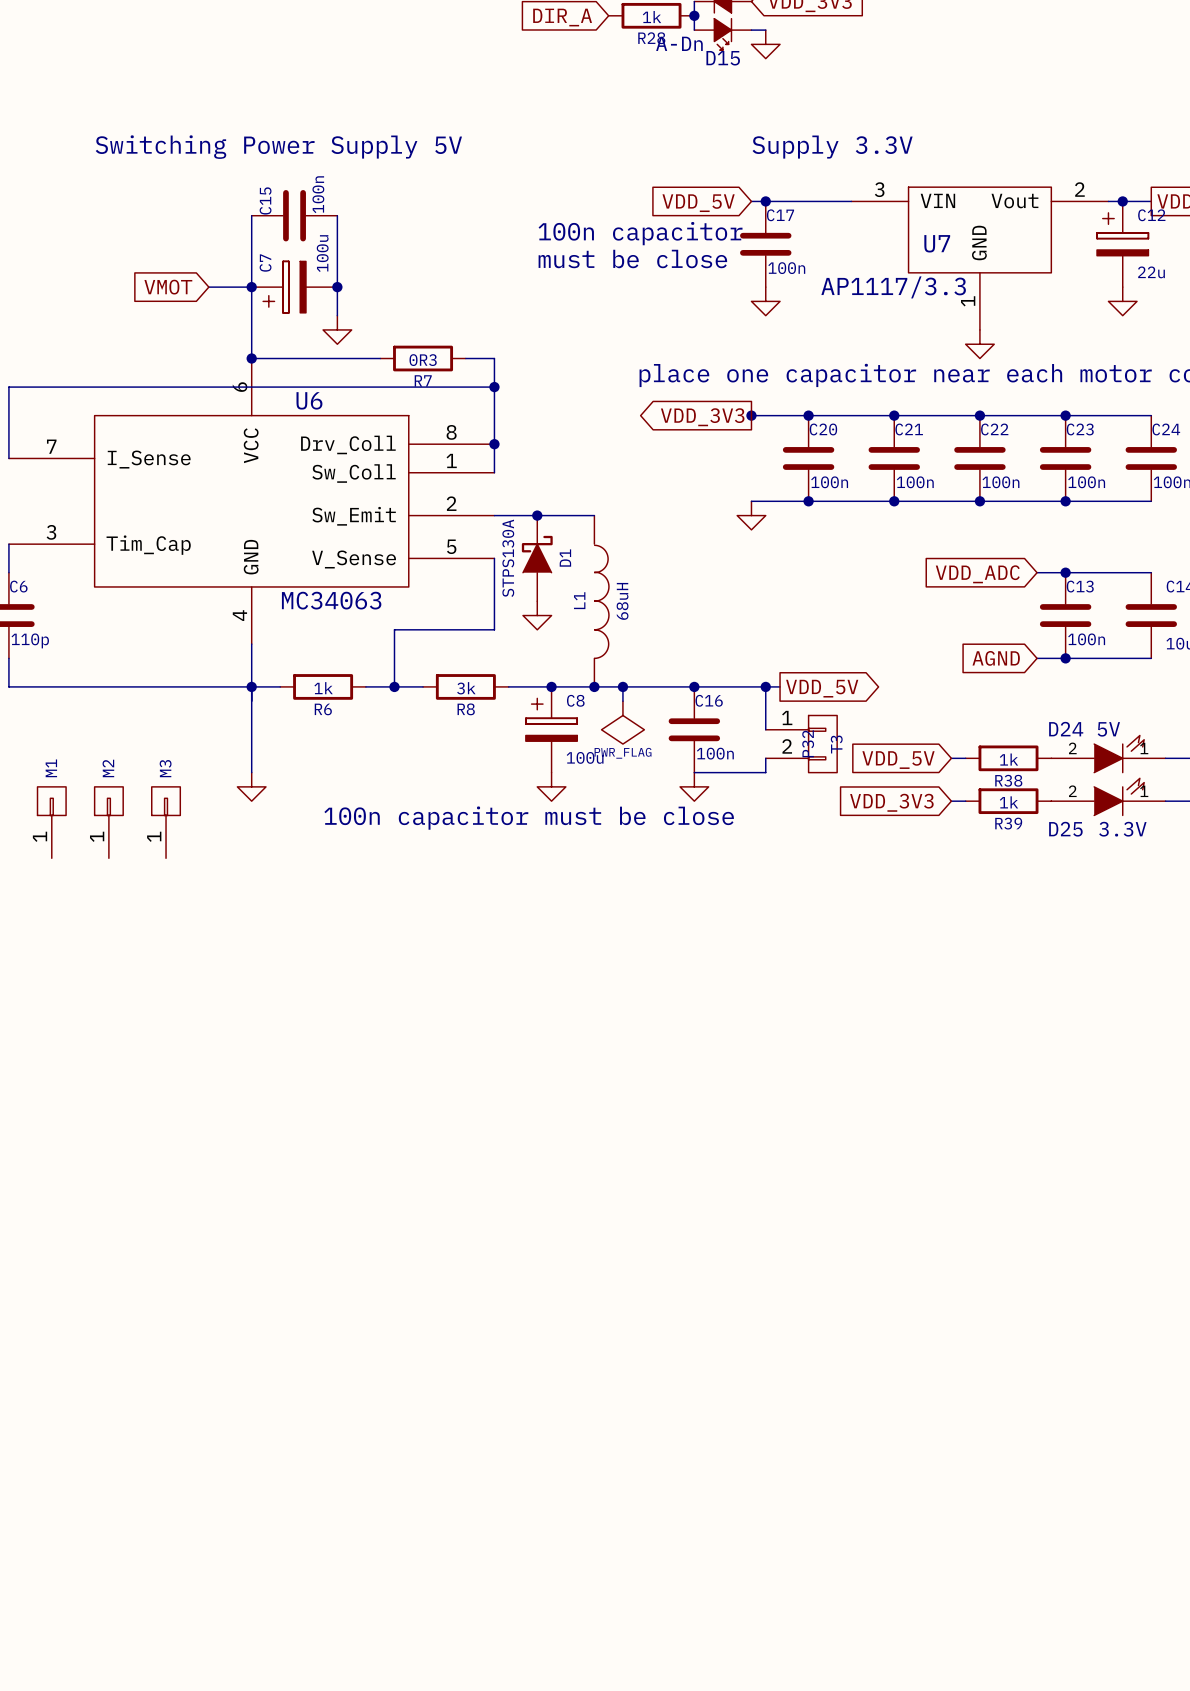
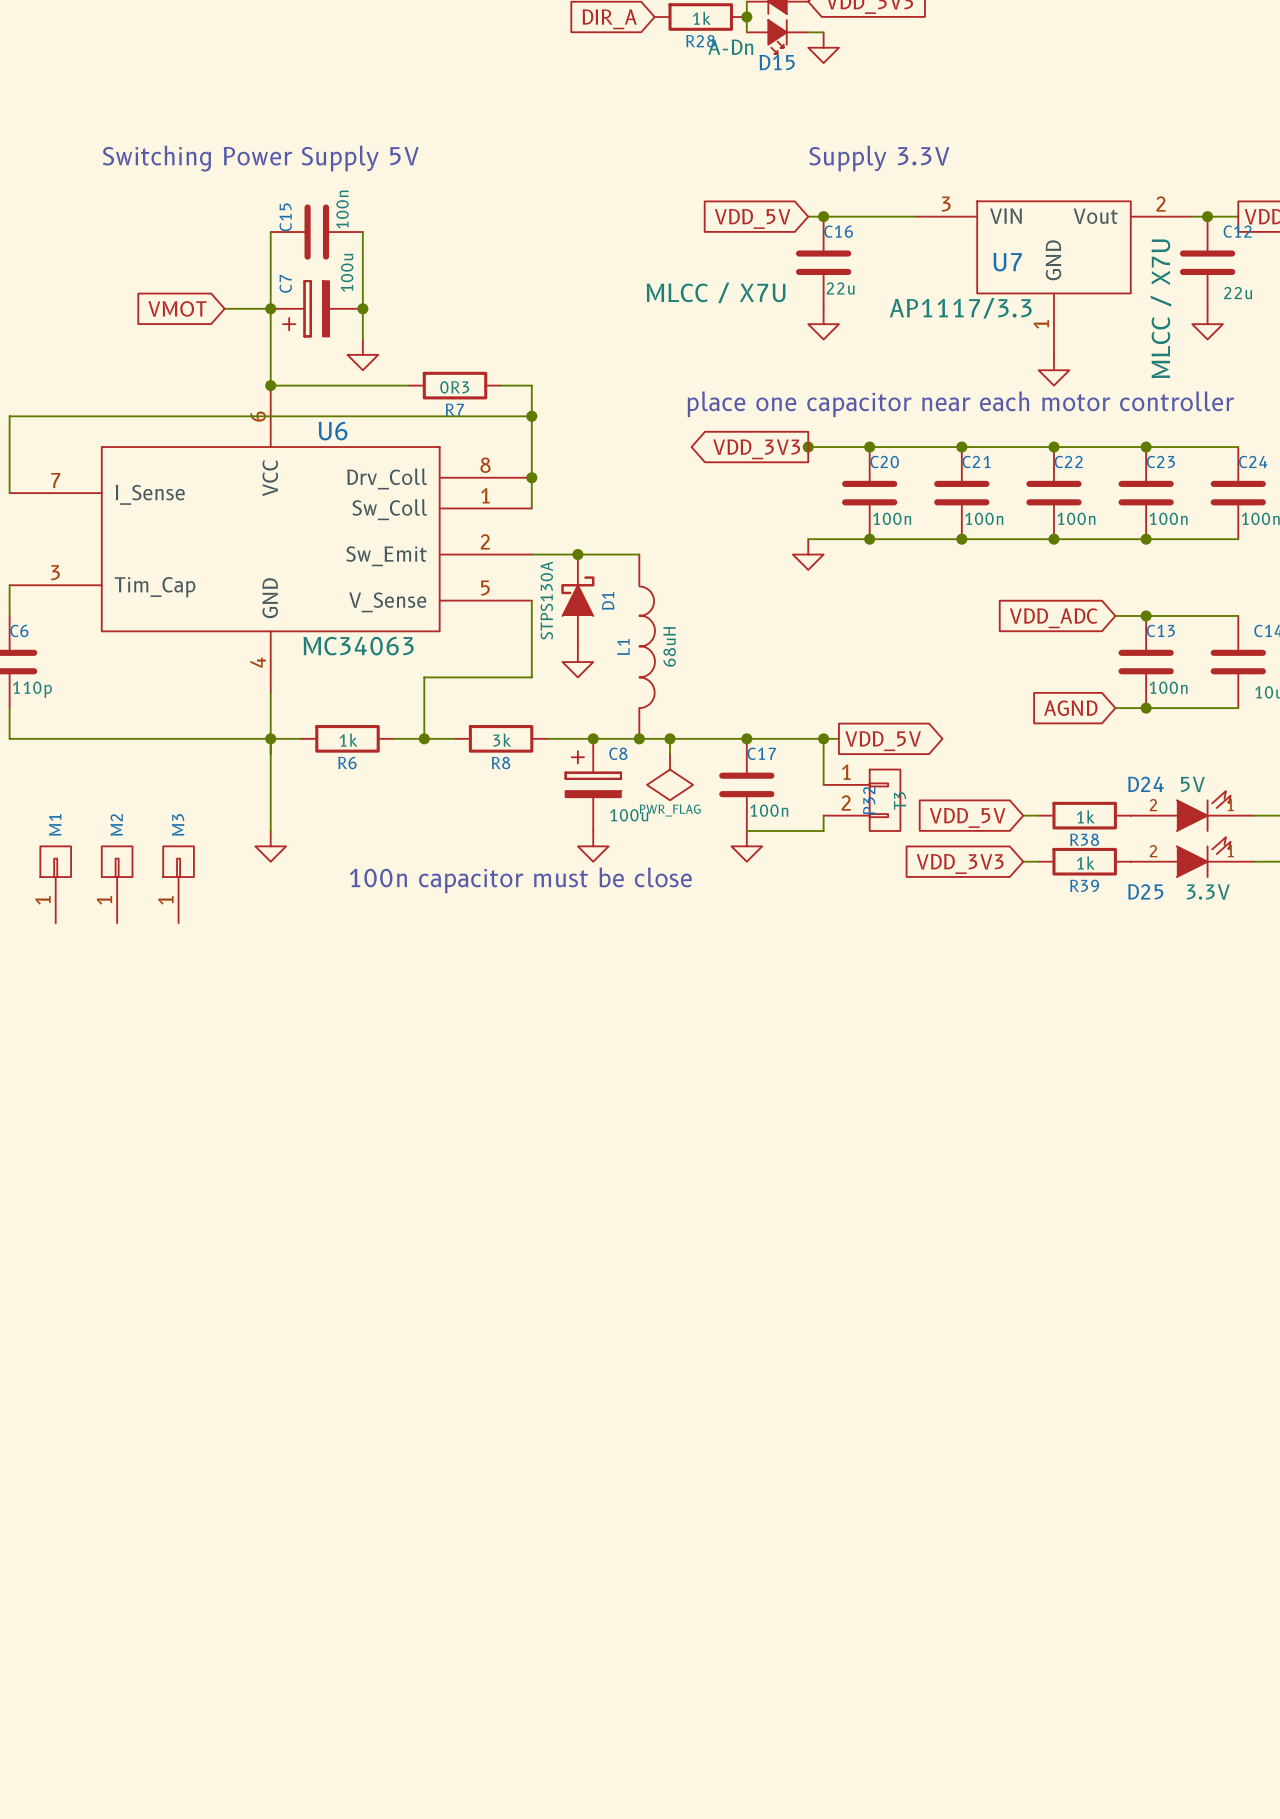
C12 symbol: [1097, 201, 1149, 288] -> [1179, 216, 1236, 309]
C17 name: C17 (780, 215) -> C16 (838, 231)
text: 100n capacitor (640, 233) -> none
text: must be close (632, 258) -> none
C17 value: 100n (786, 268) -> 22u (840, 288)
C17 text: none -> MLCC / X7U (716, 292)
C12 text: none -> MLCC / X7U (1160, 308)
C16 name: C16 (709, 700) -> C17 (761, 753)

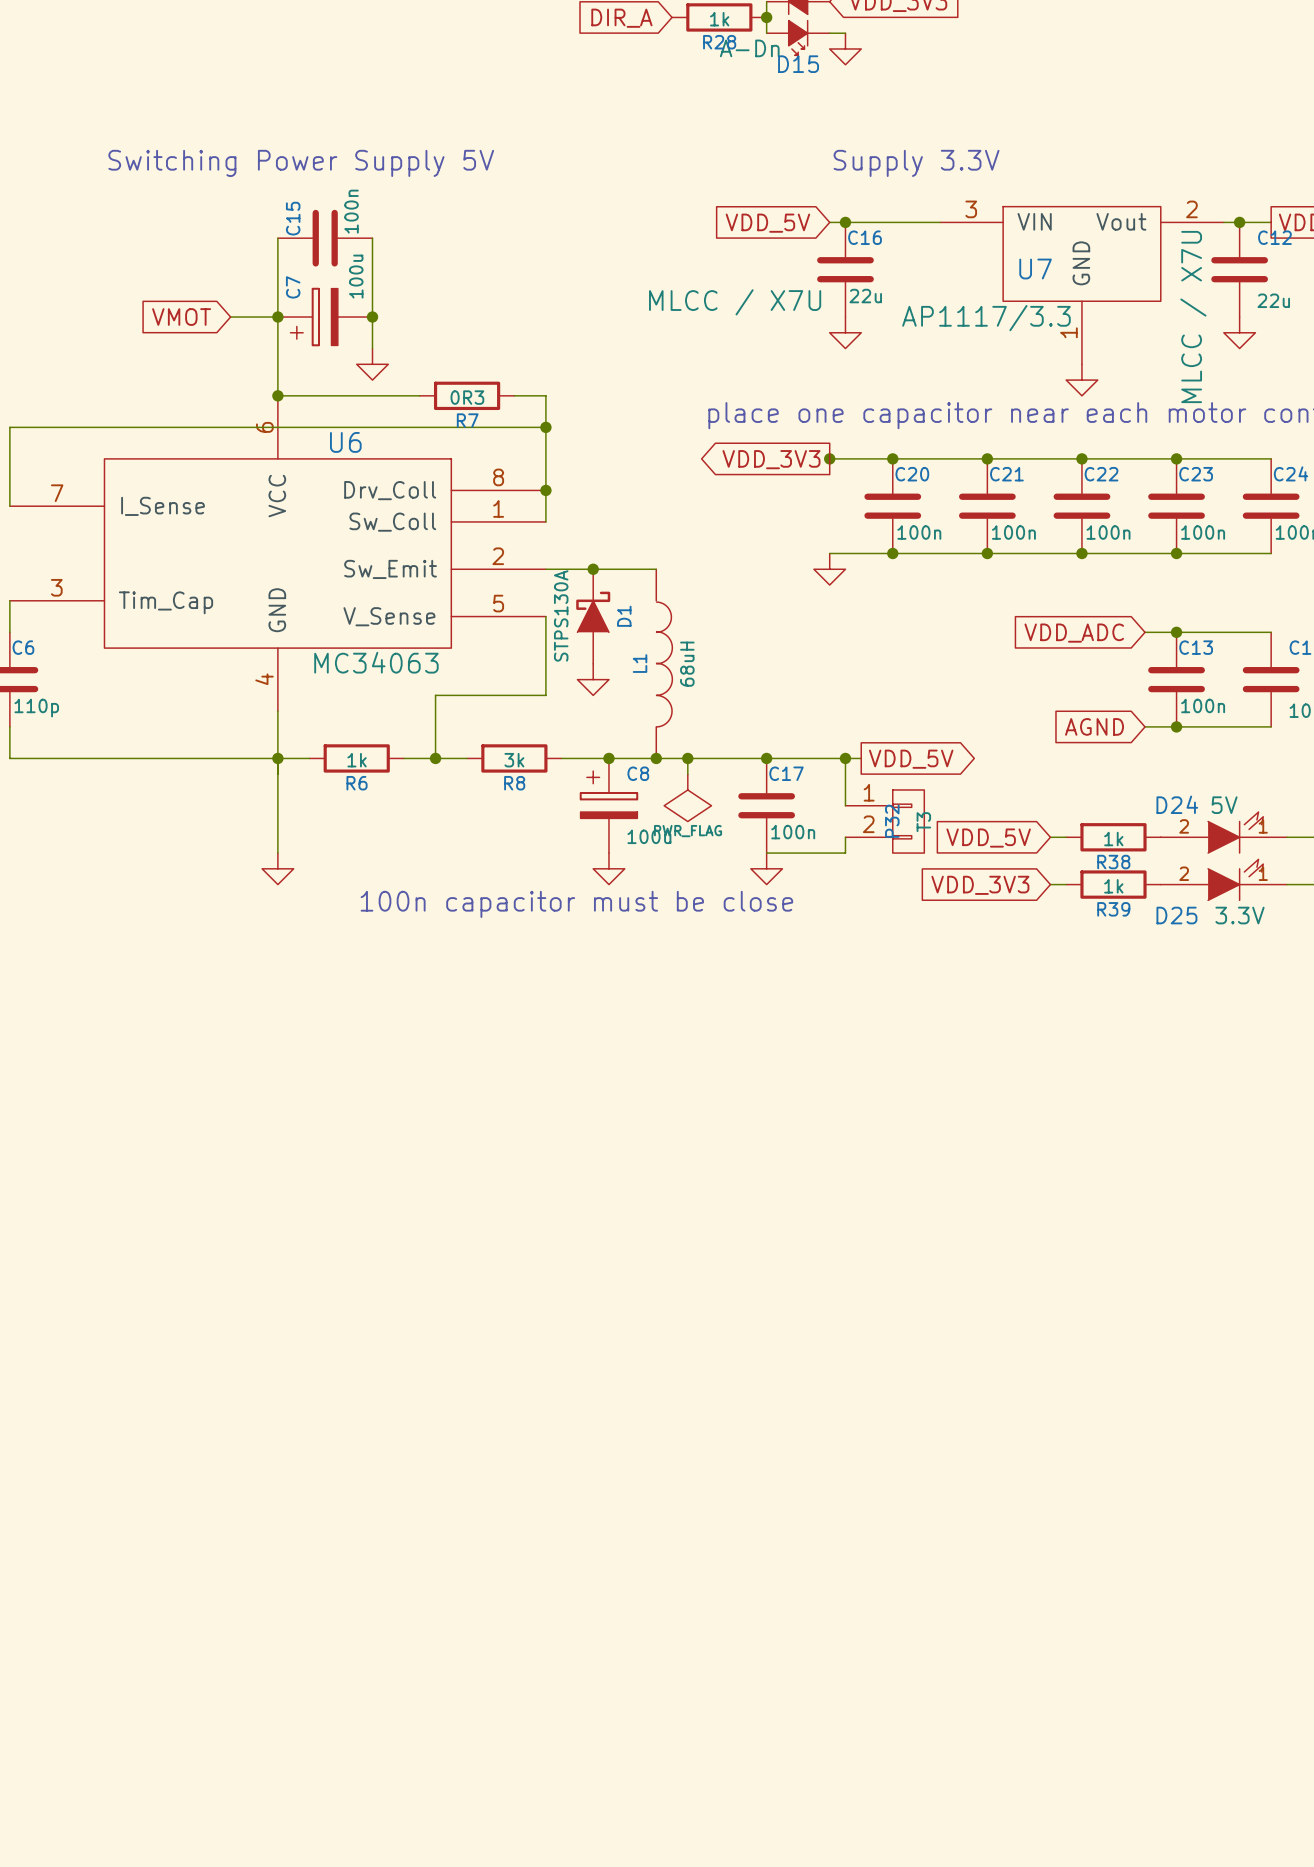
M1: (55, 884) -> none
M2: (117, 884) -> none
M3: (178, 884) -> none

